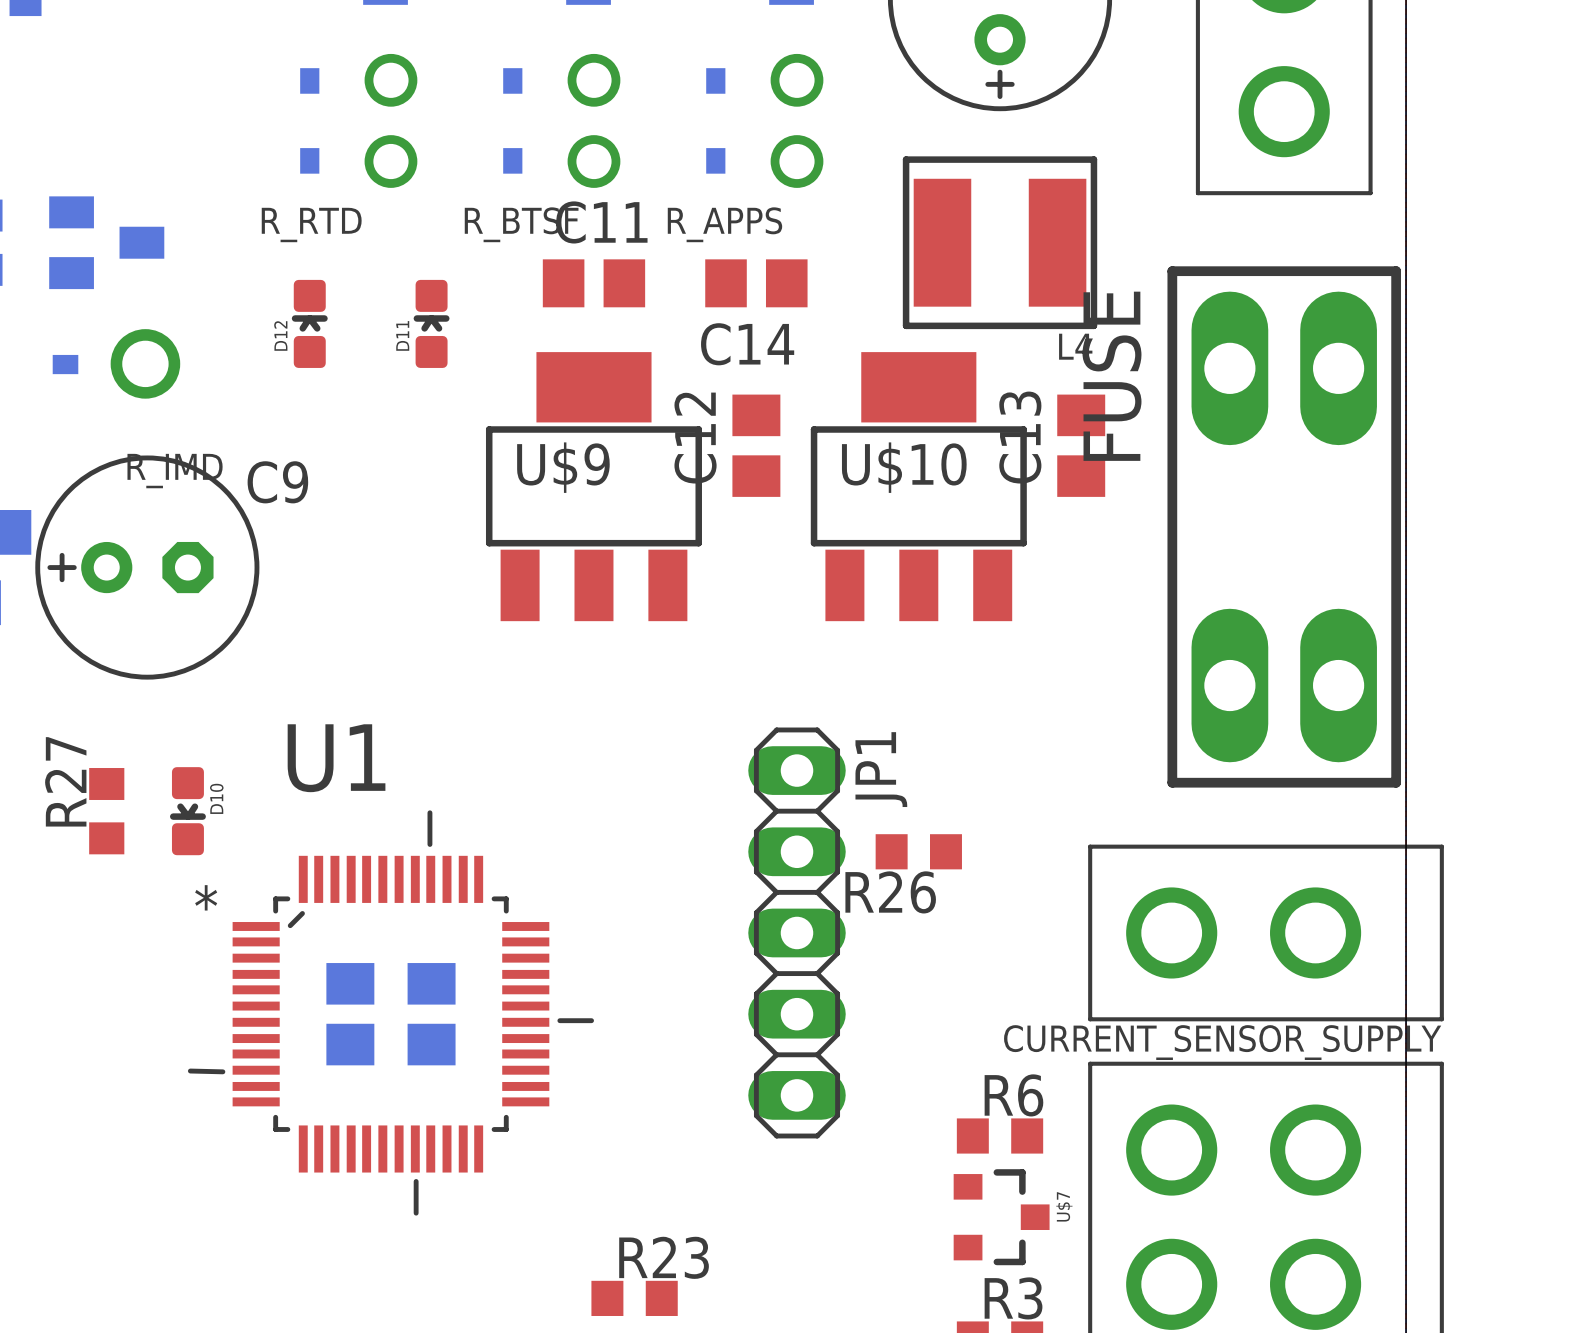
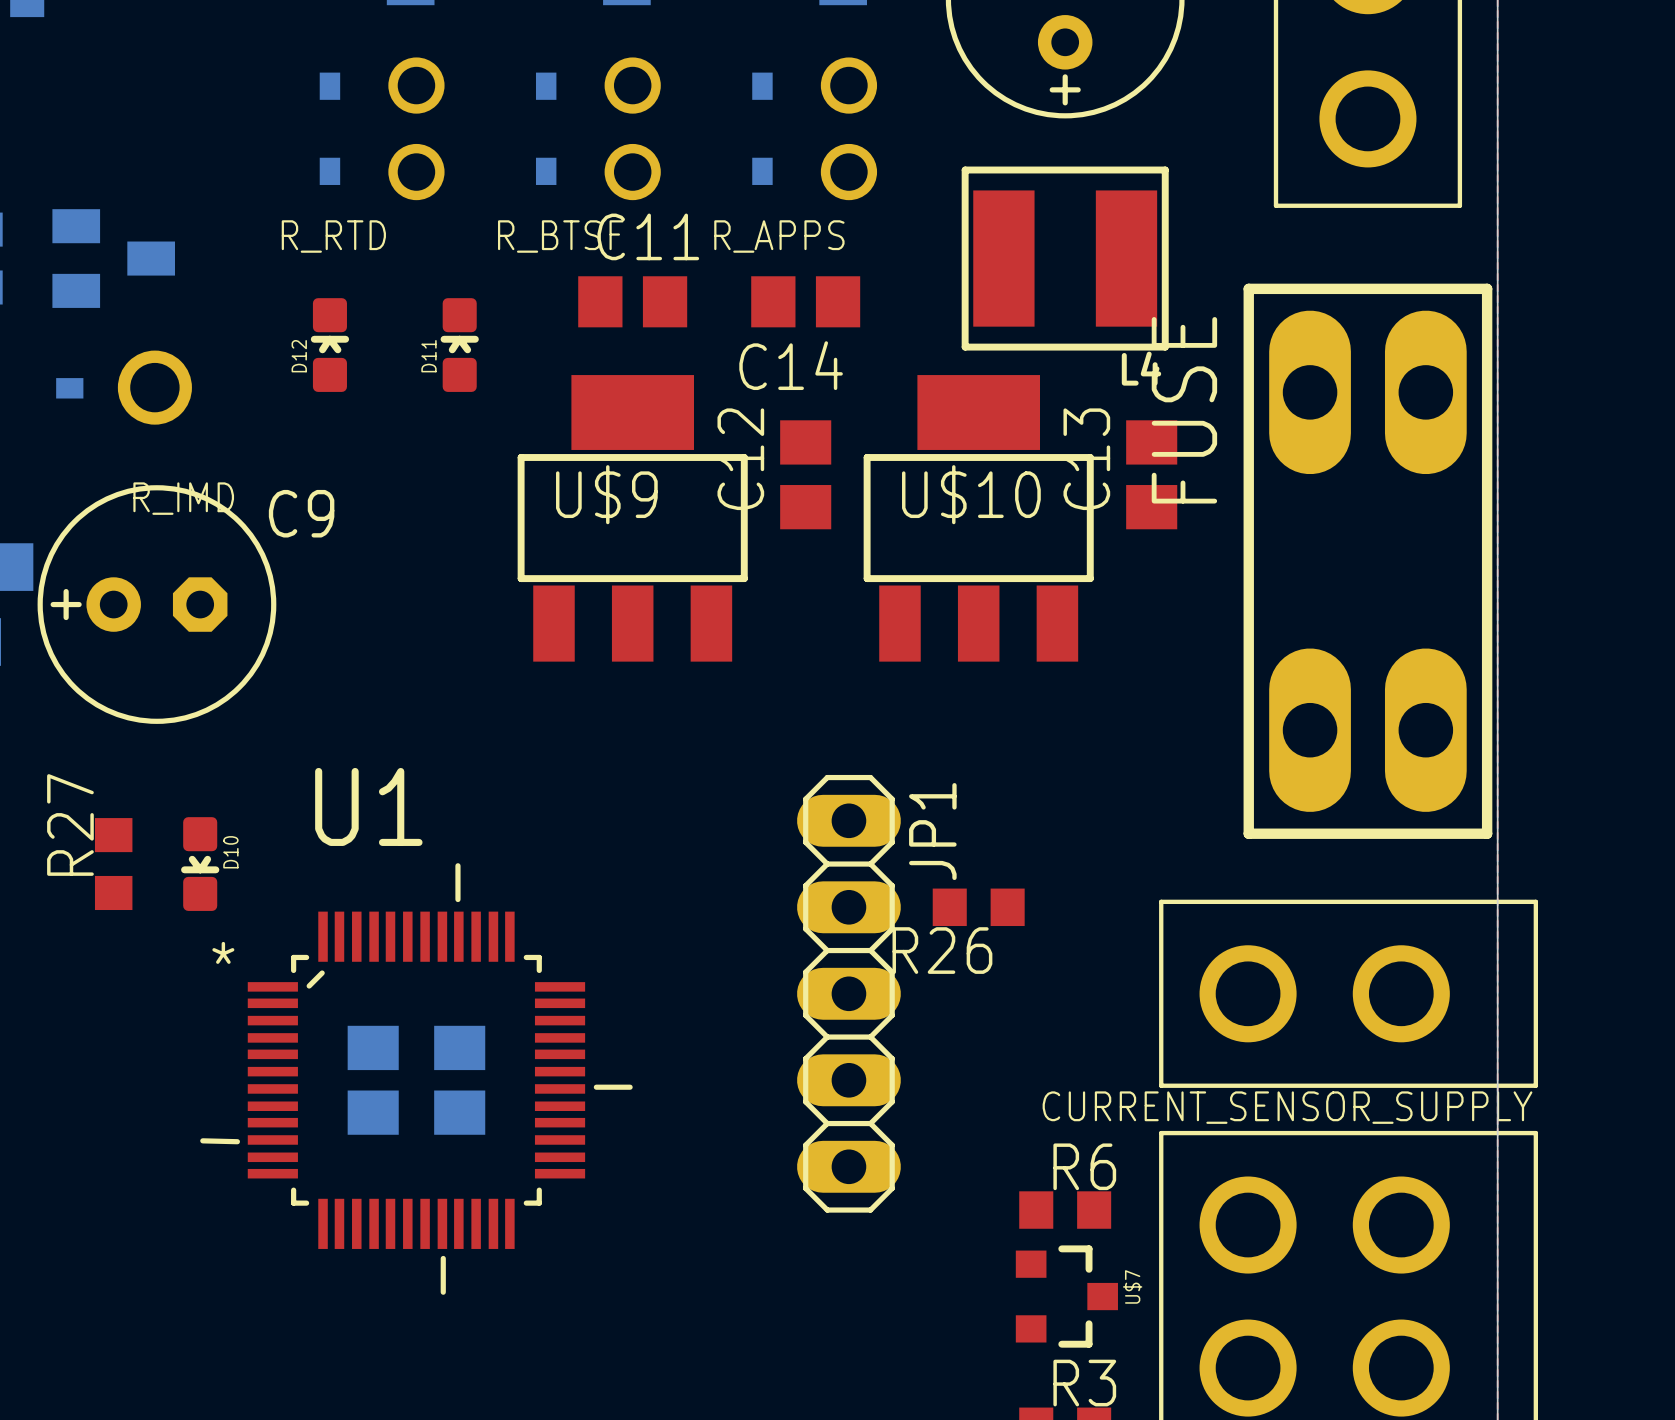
R23: (634, 1298) -> none

